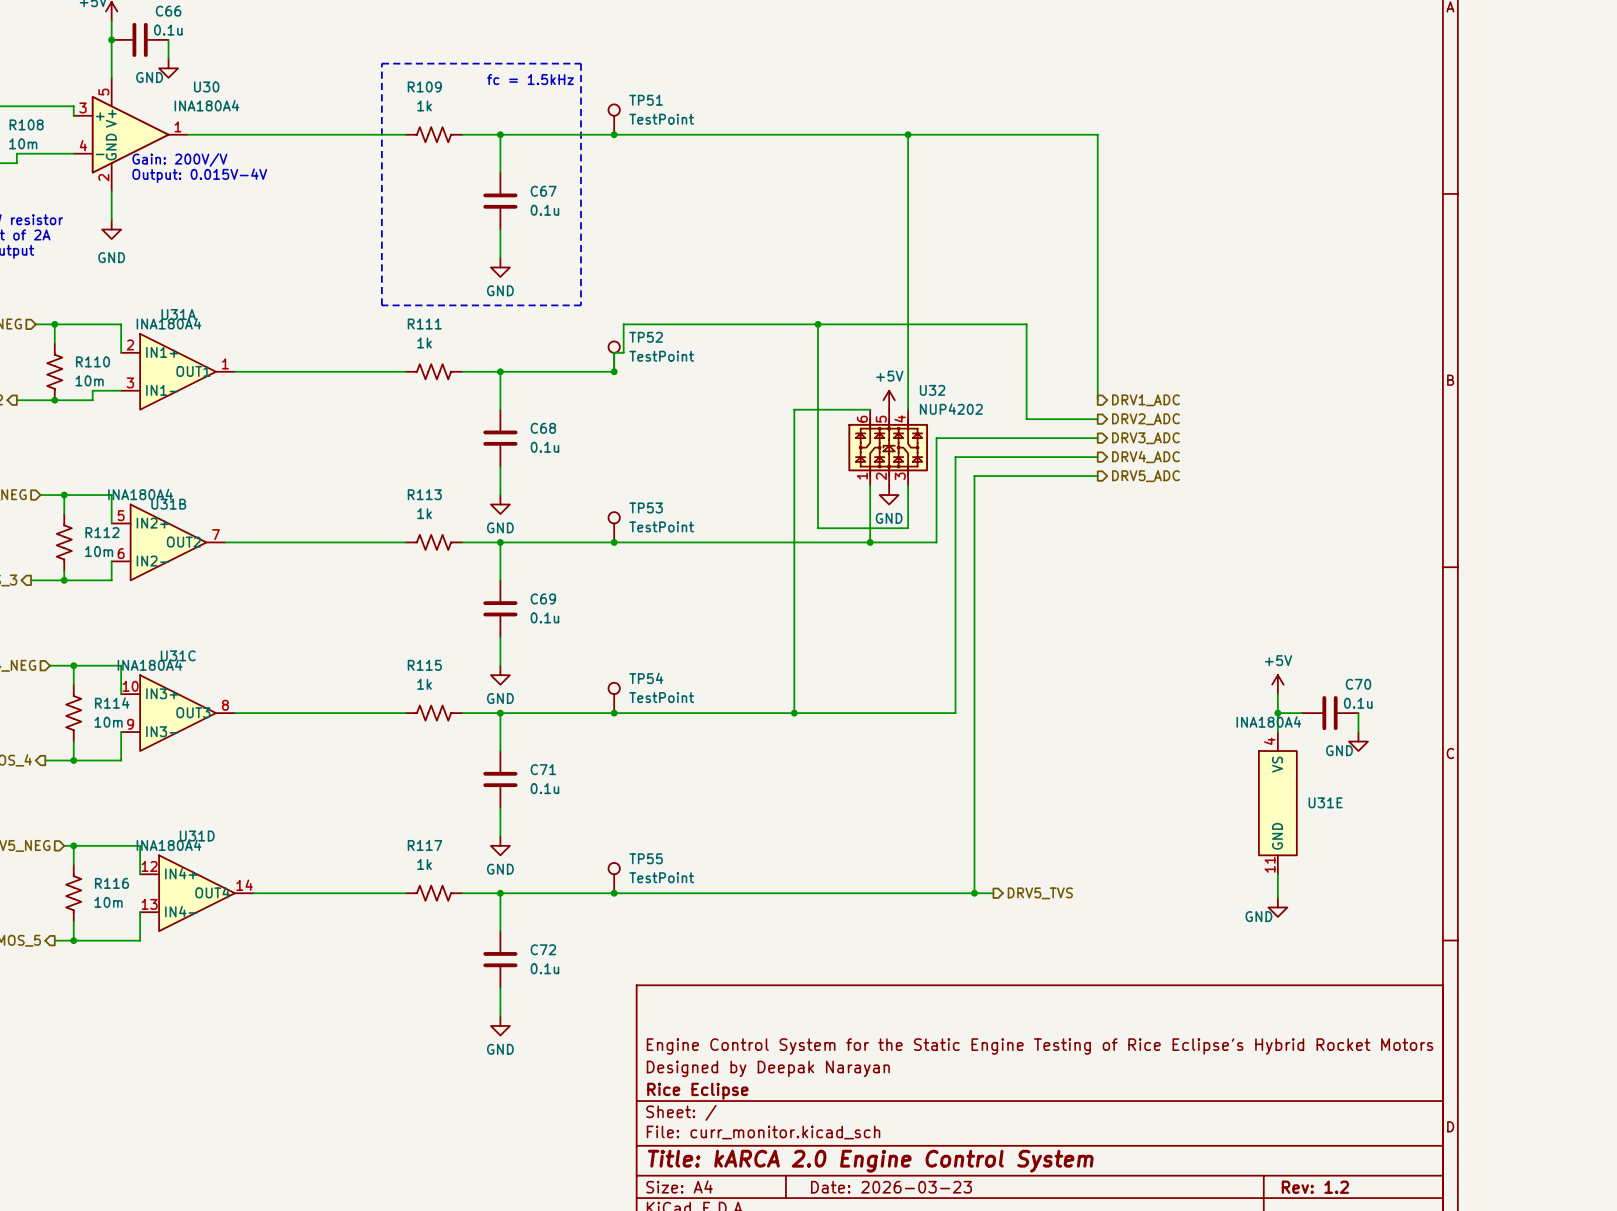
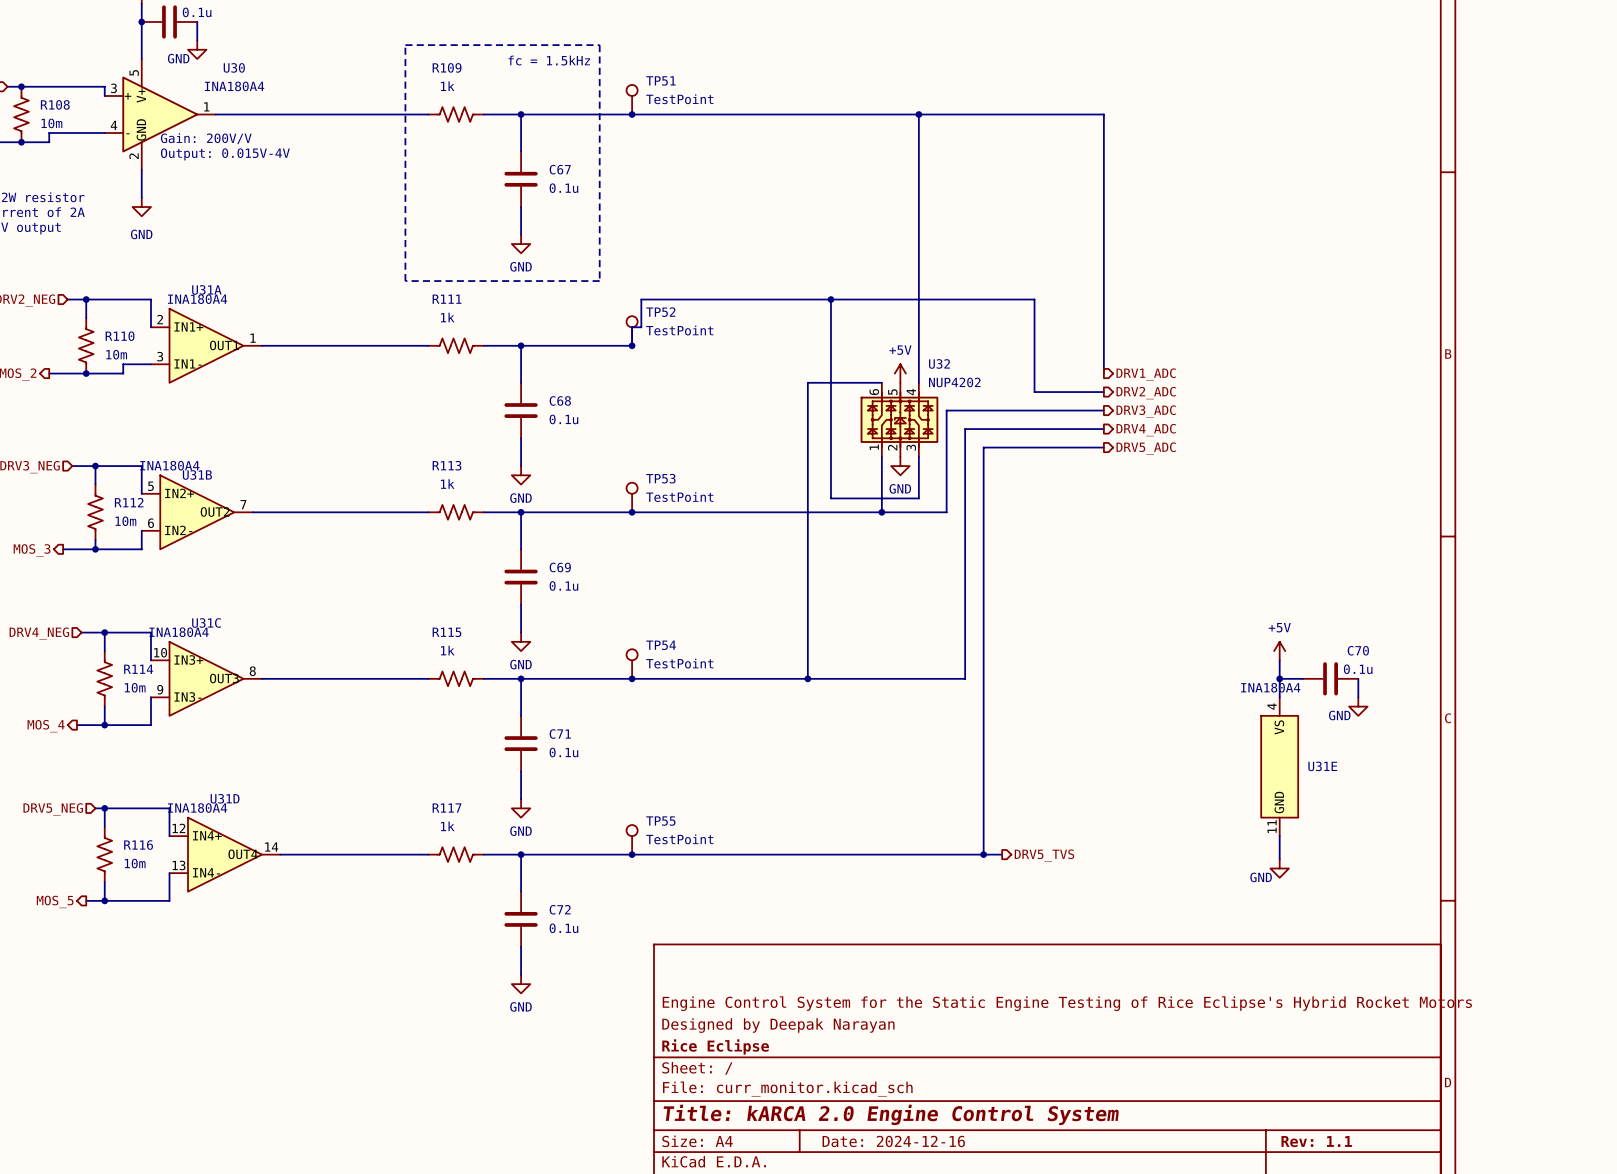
title block: Date: 2026-03-23 (891, 1187) -> Date: 2024-12-16 (893, 1141)
title block: Rev: 1.2 (1315, 1187) -> Rev: 1.1 (1316, 1141)

